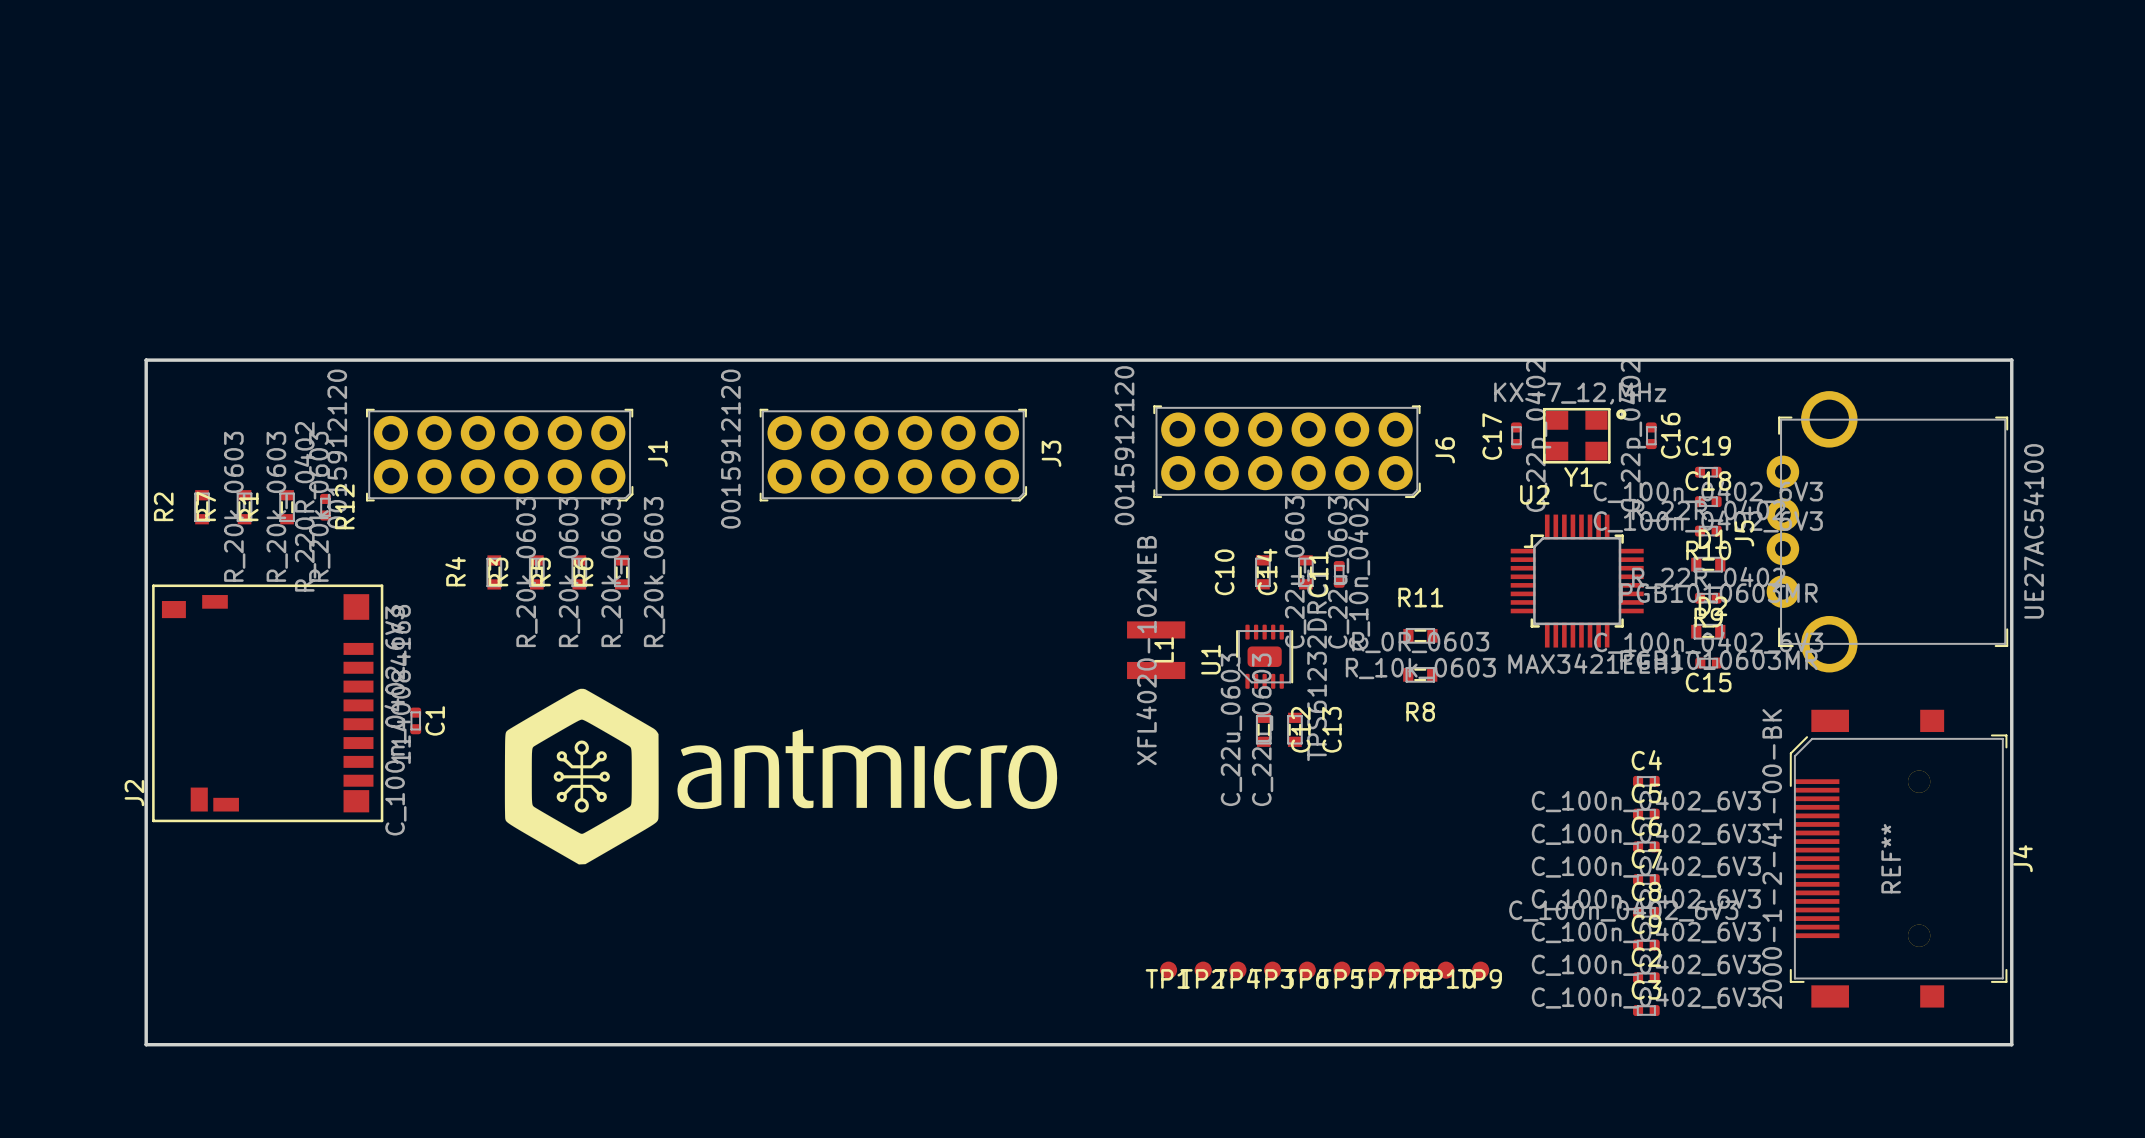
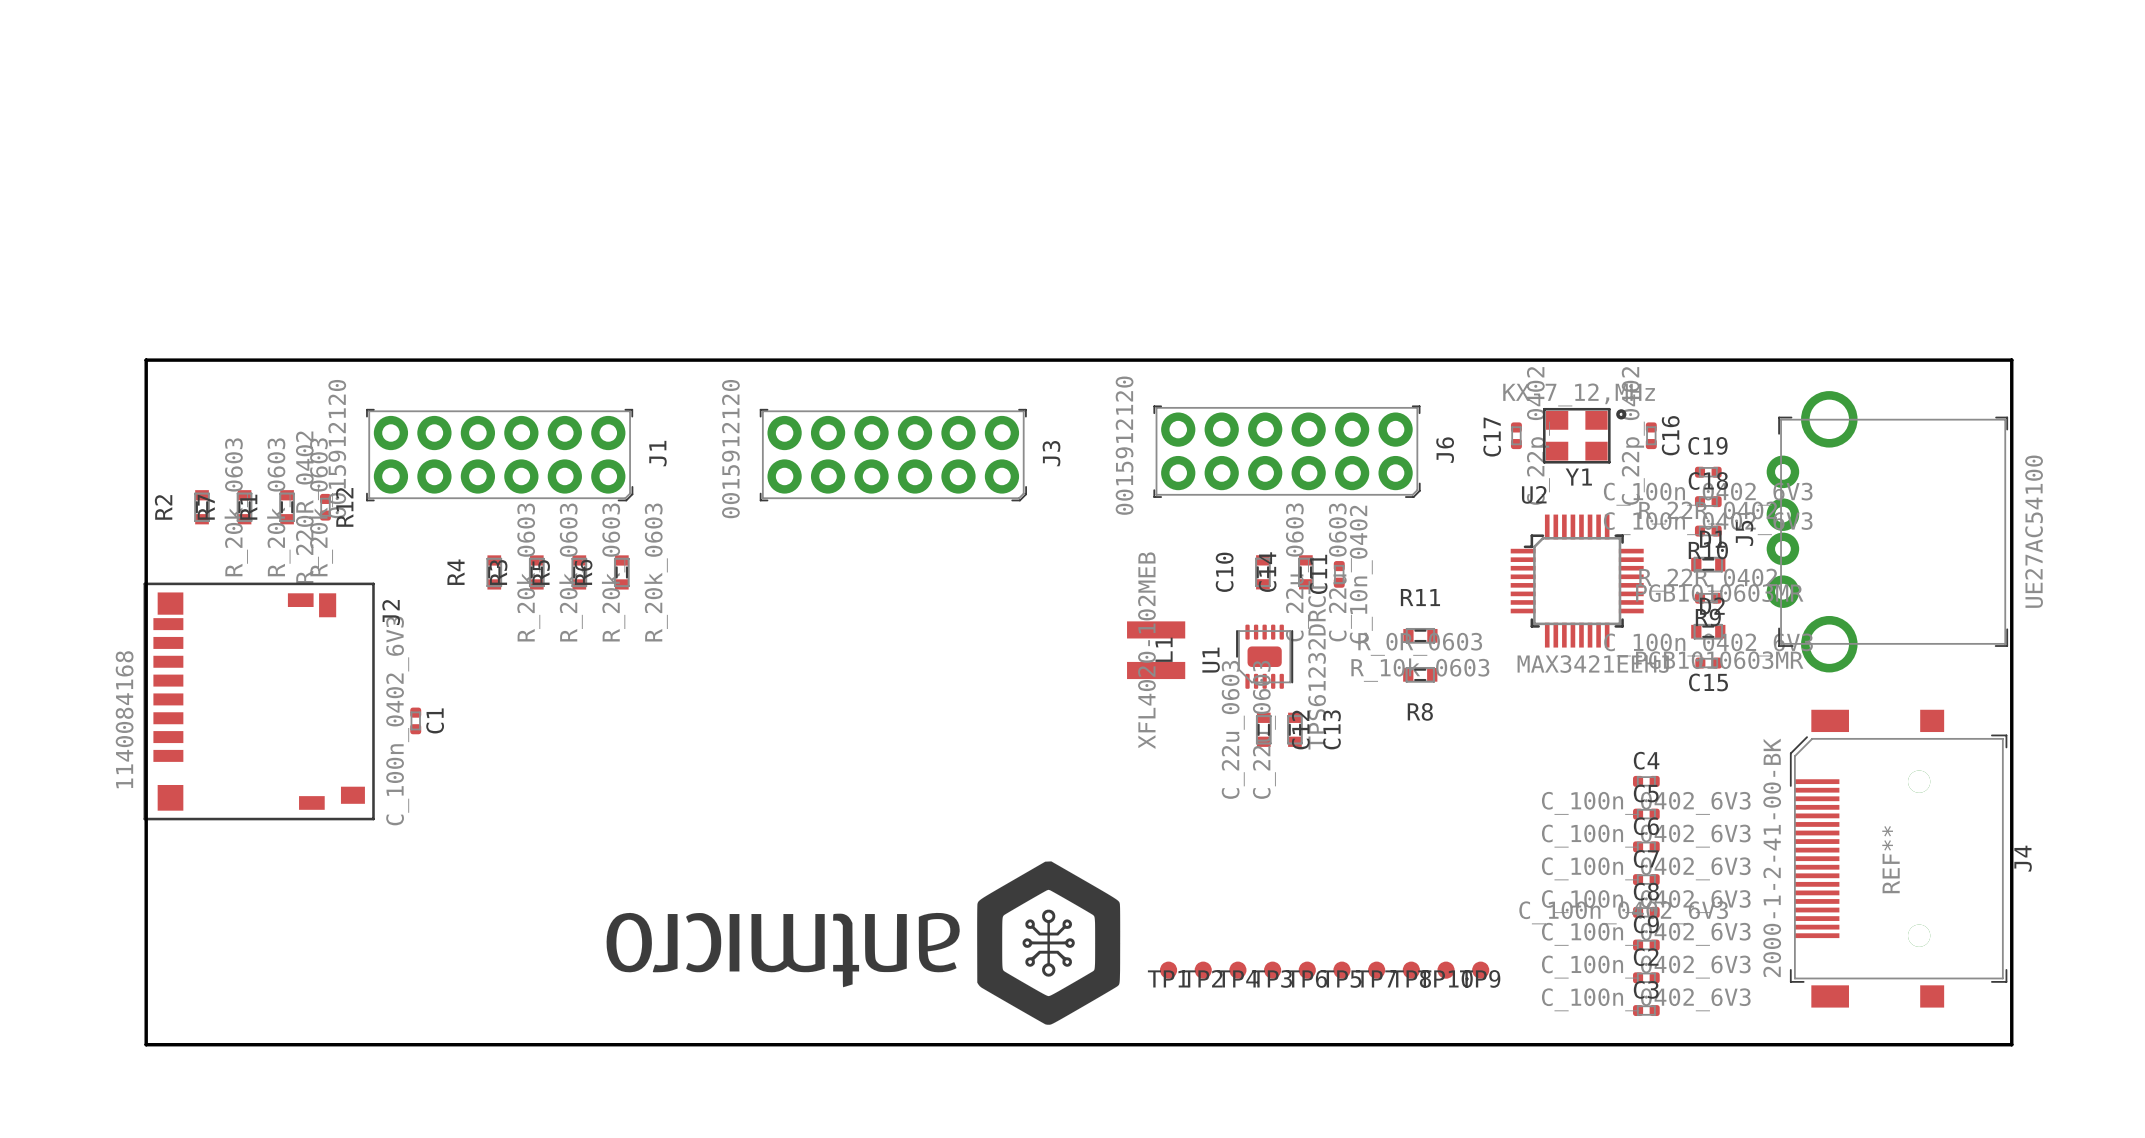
drawing: [504, 688, 1058, 865] -> none
J2 rotation: 0° (267, 703) -> 180° (259, 701)
drawing: none -> [606, 861, 1121, 1025]

